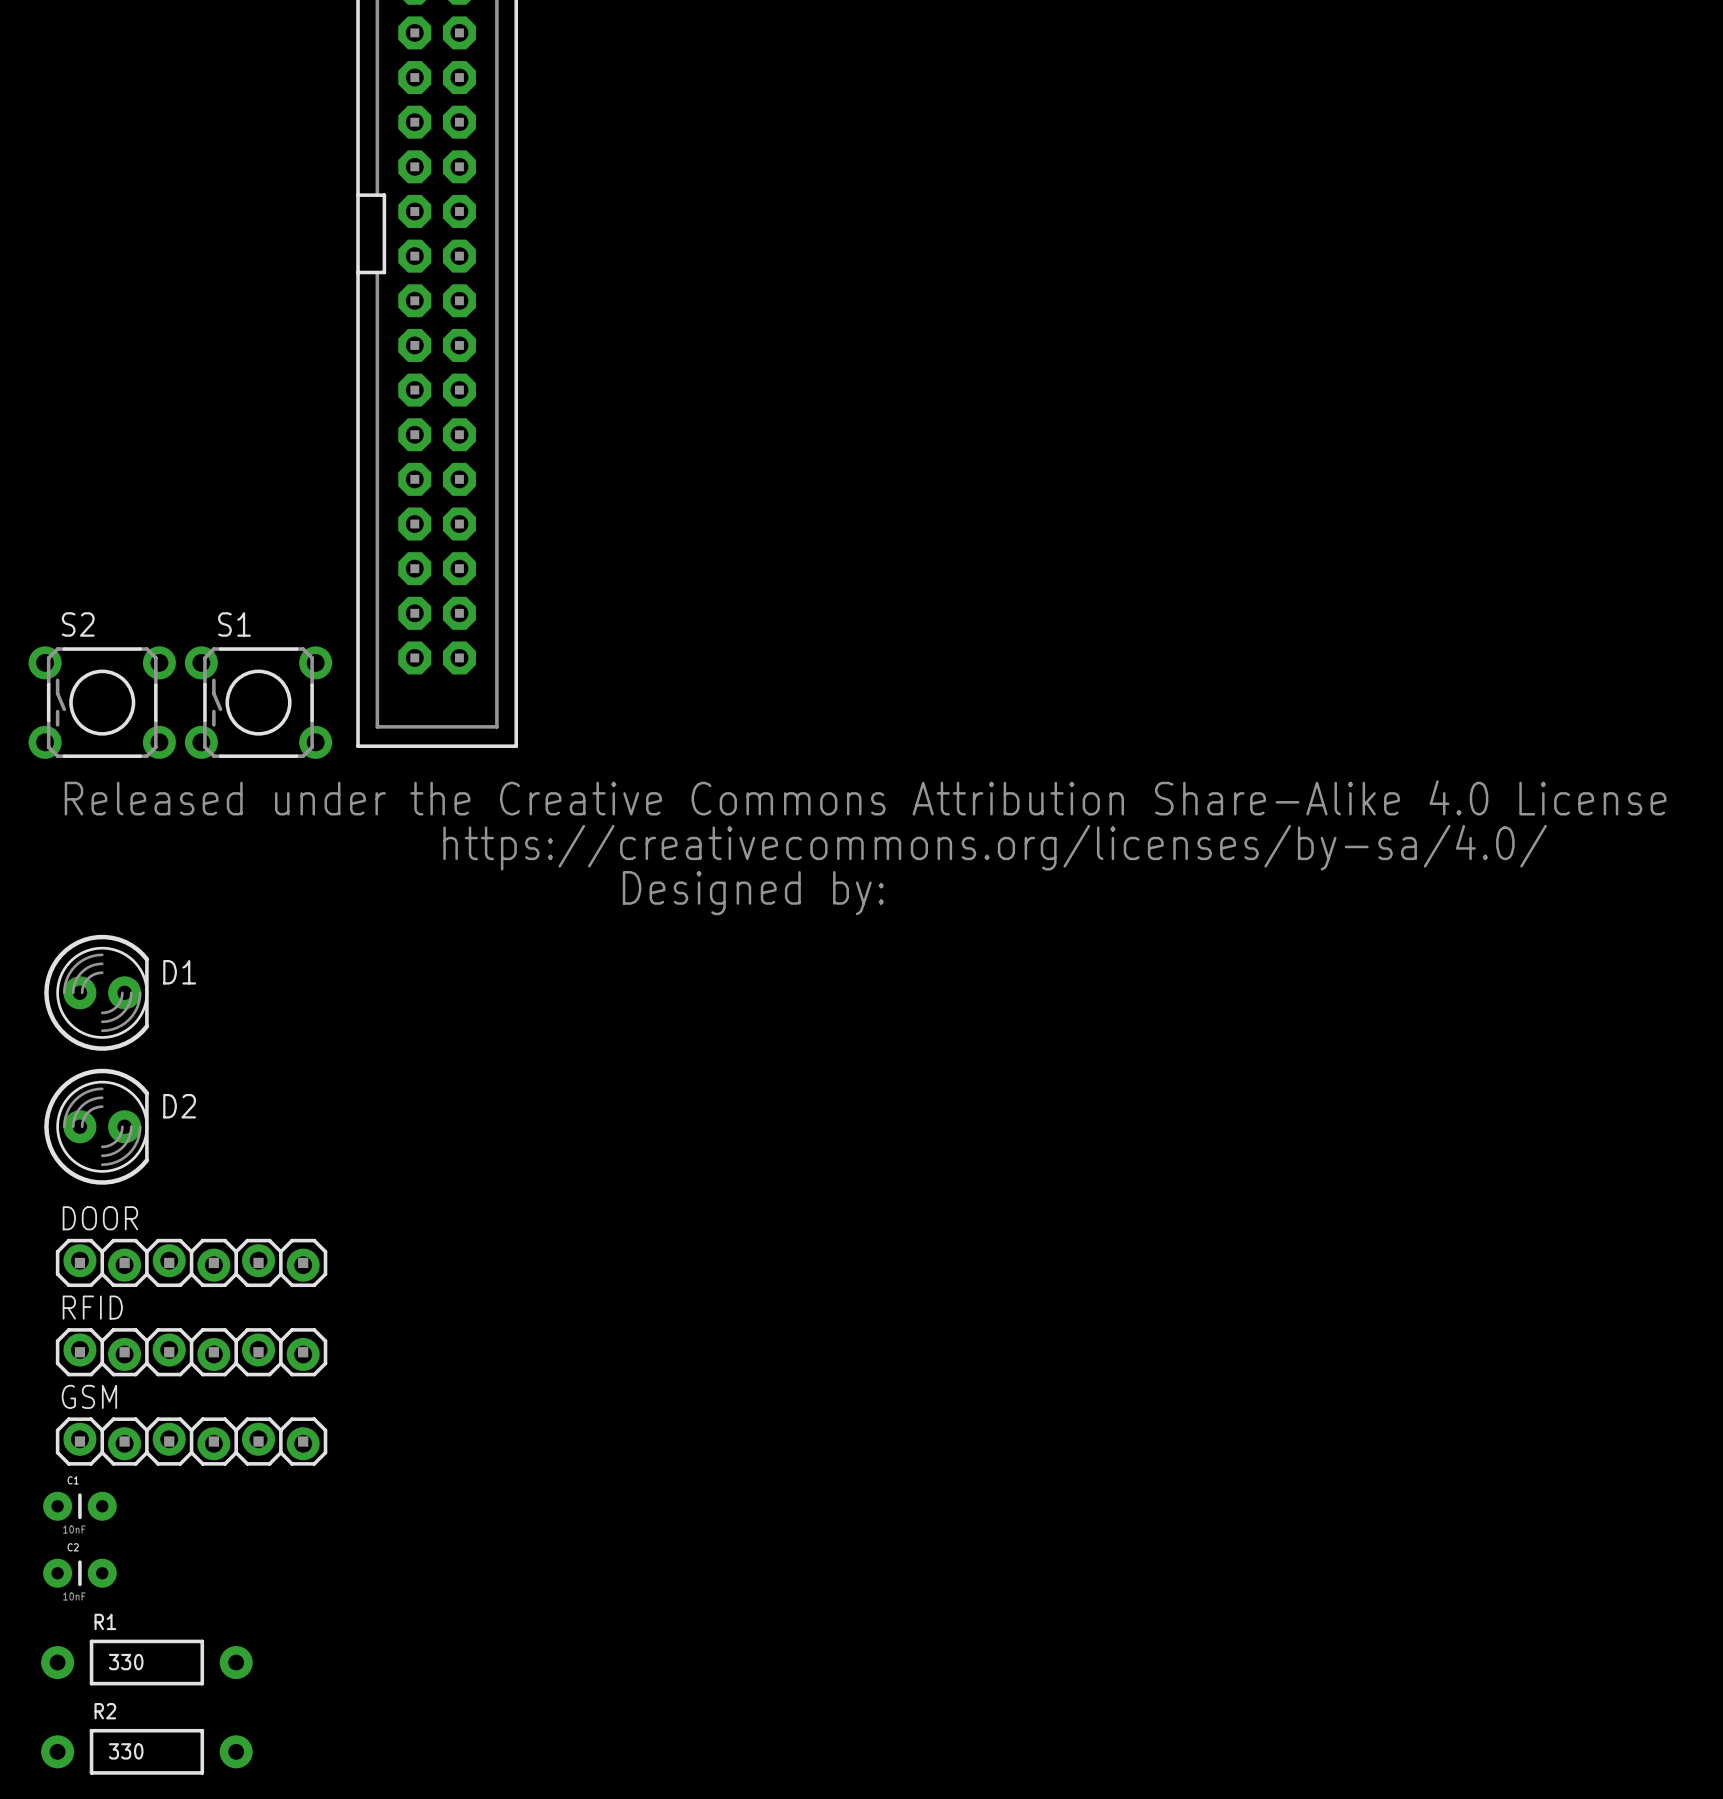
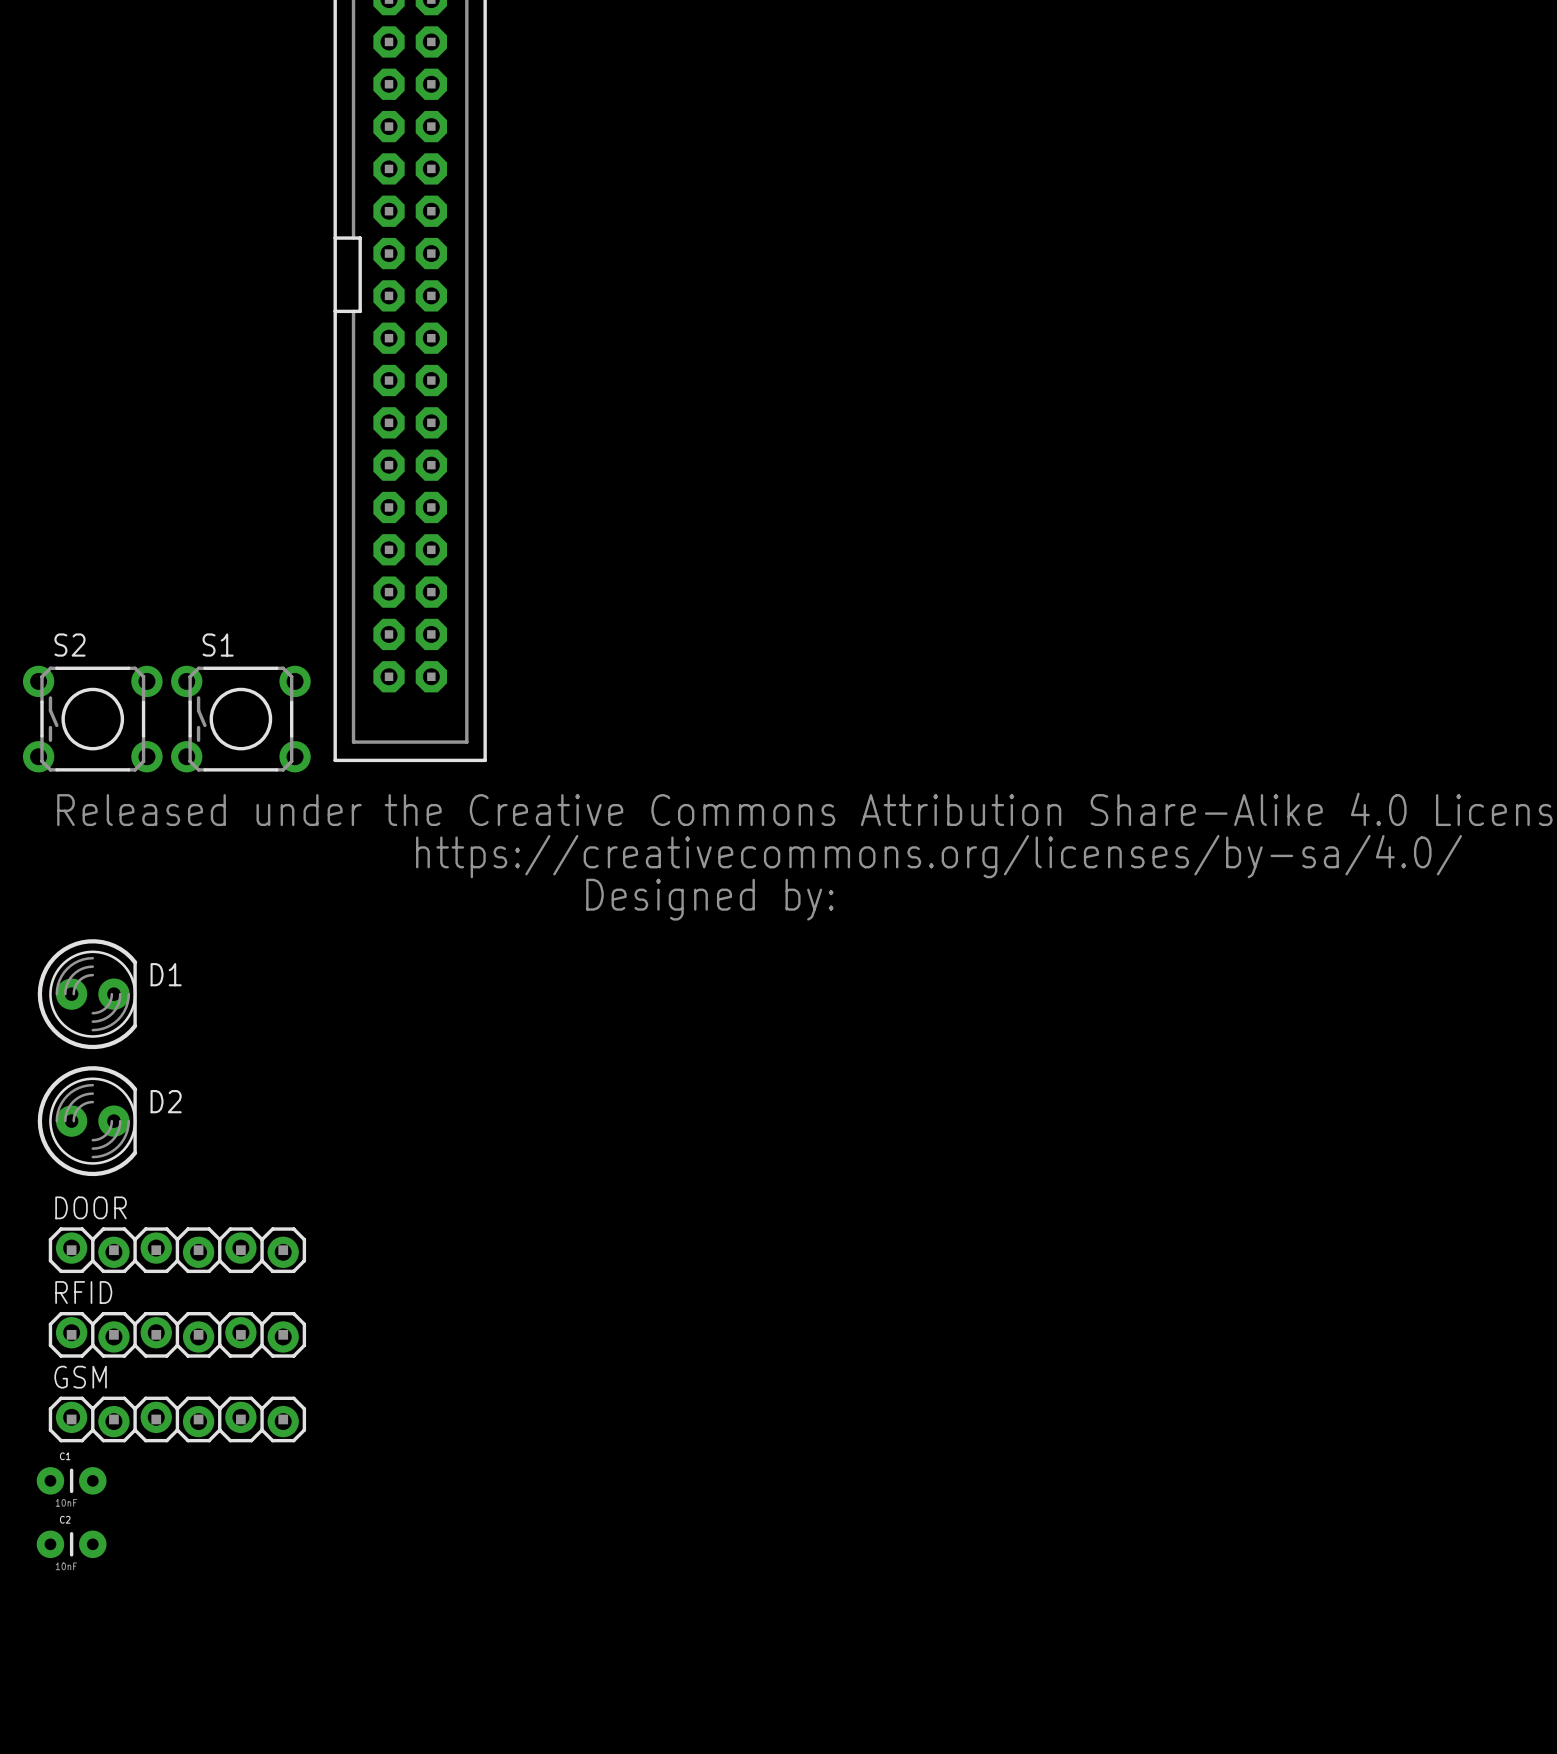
R1: 330 (146, 1662) -> none
R2: 330 (146, 1751) -> none

